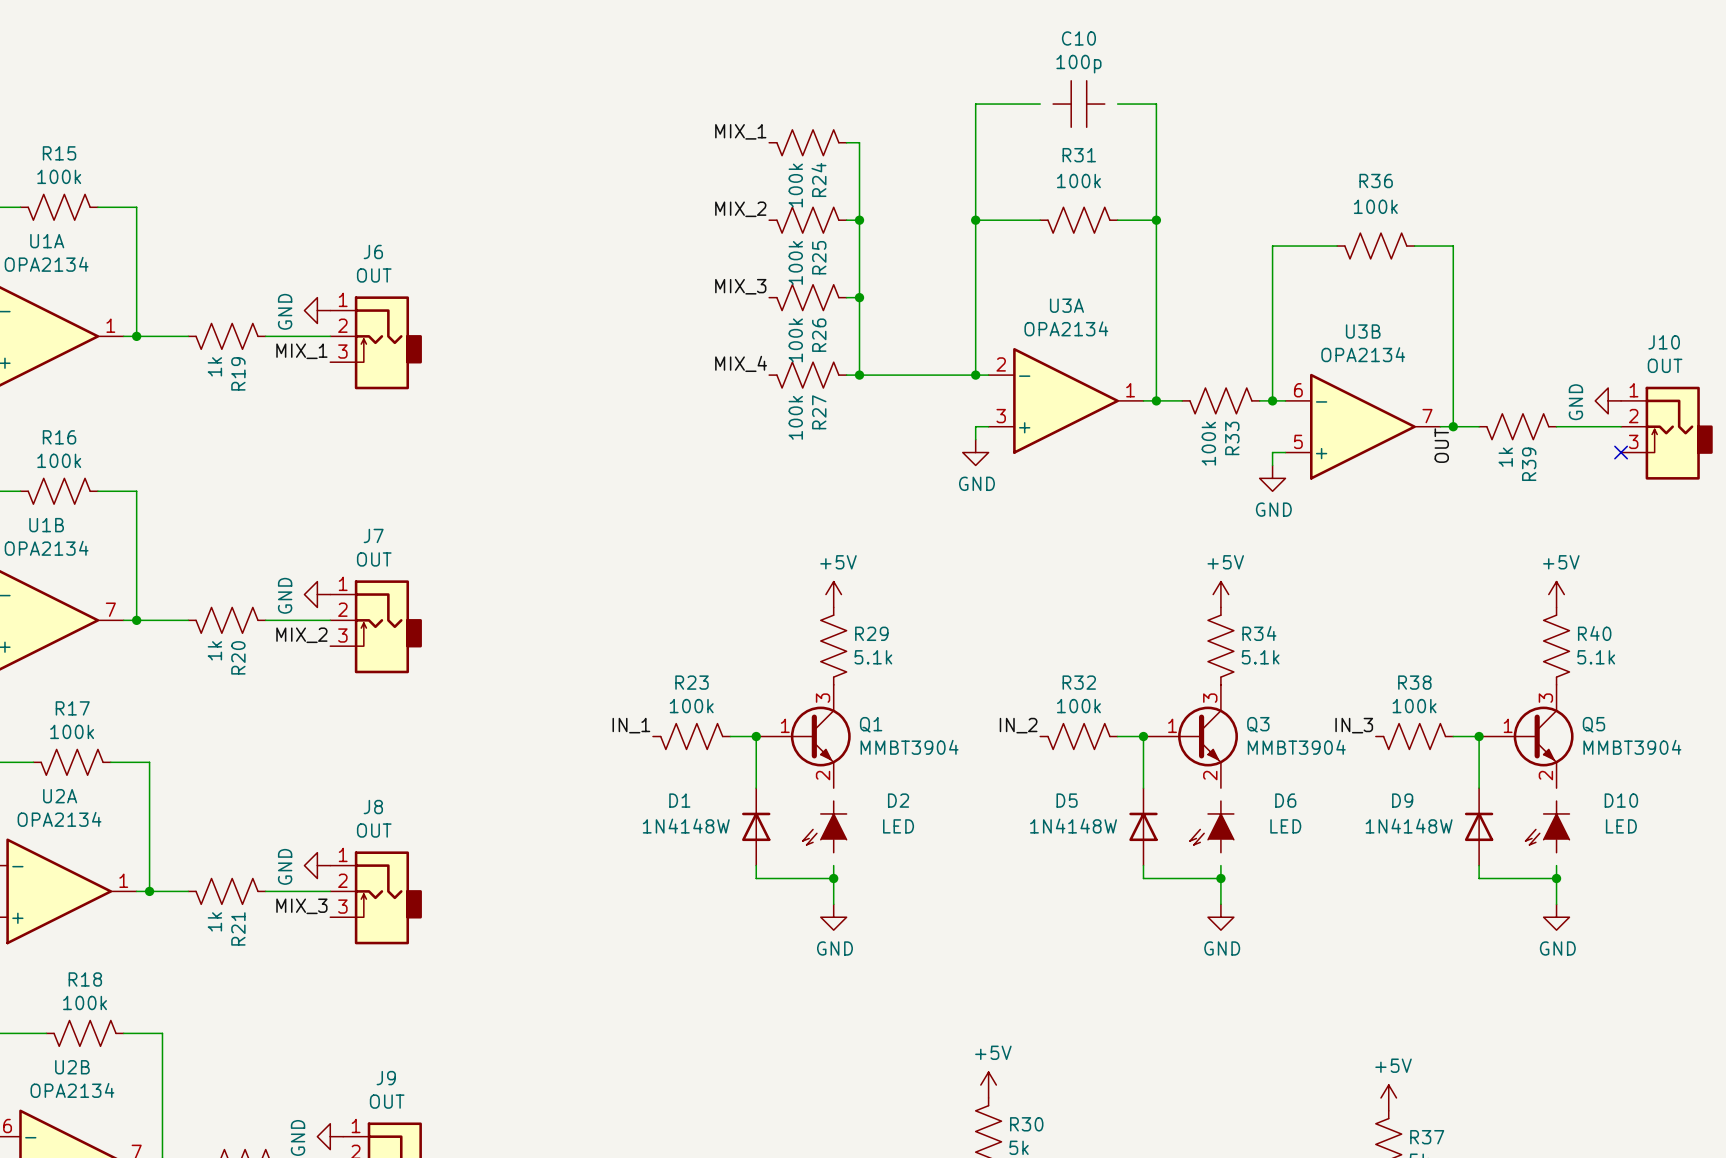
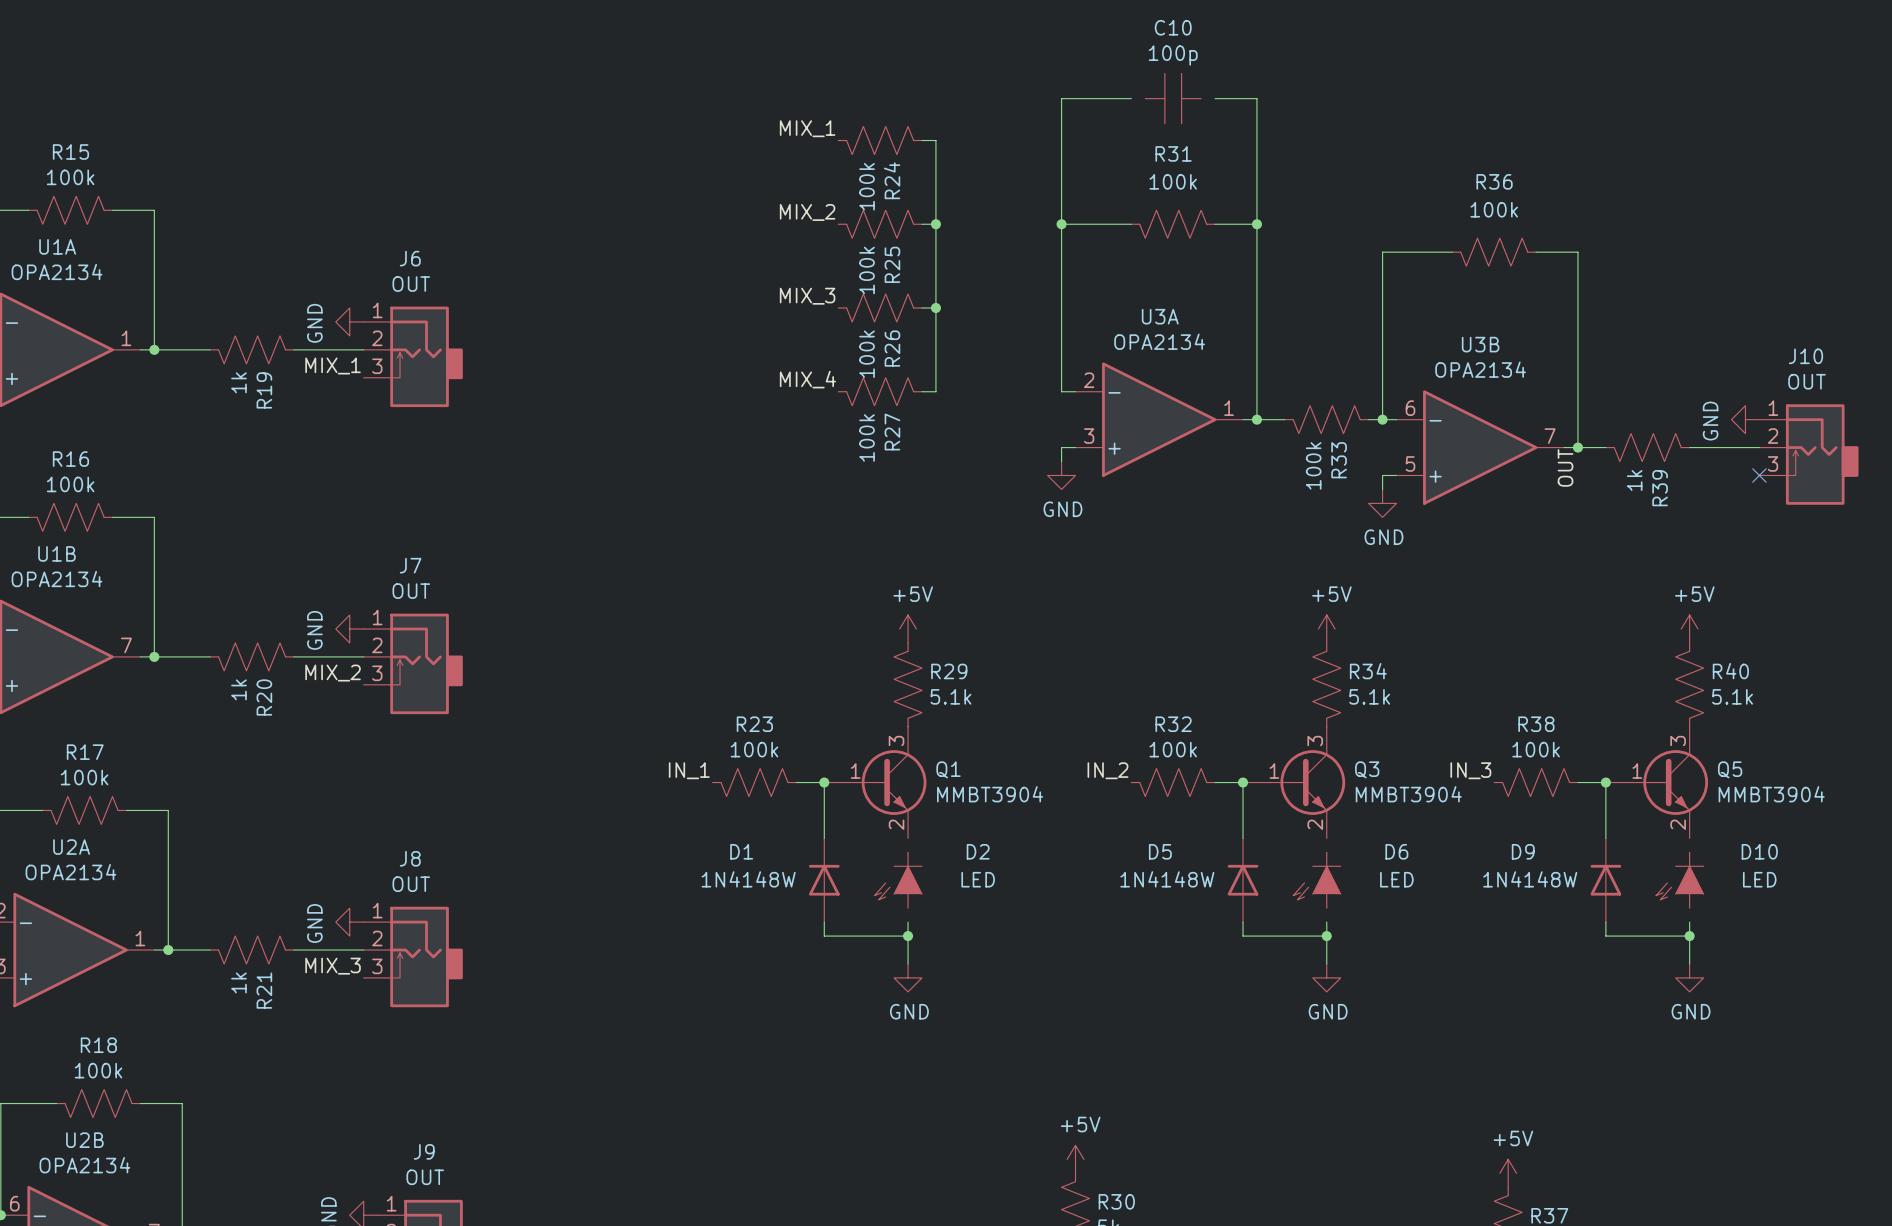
wire: (859, 375) (975, 375) -> none
junction: (859, 375) -> none
junction: (975, 375) -> none

